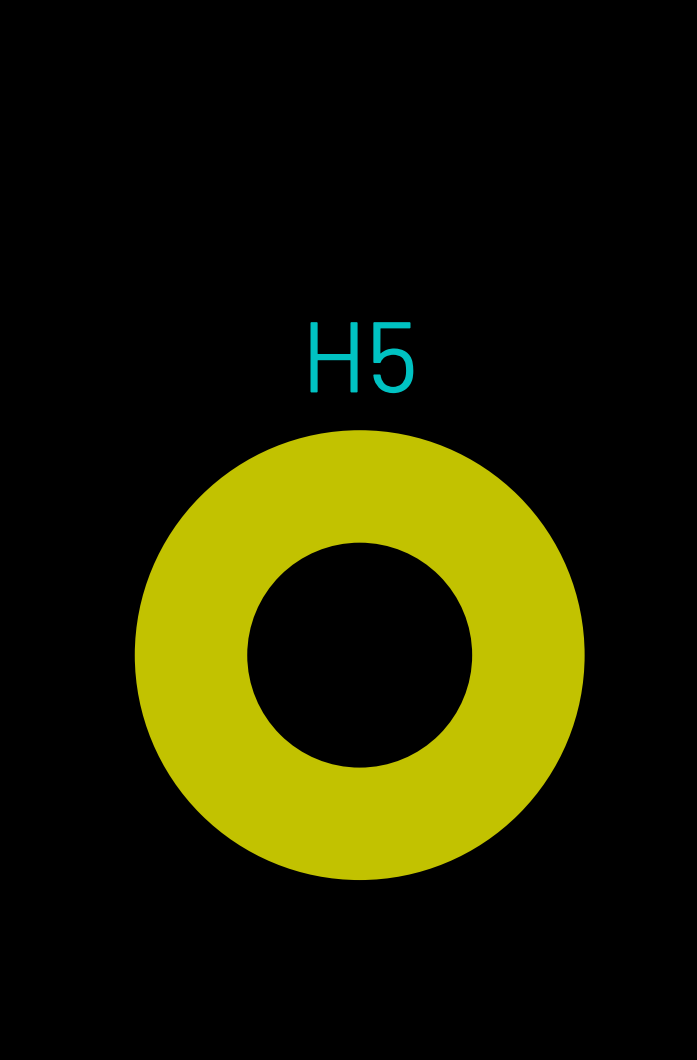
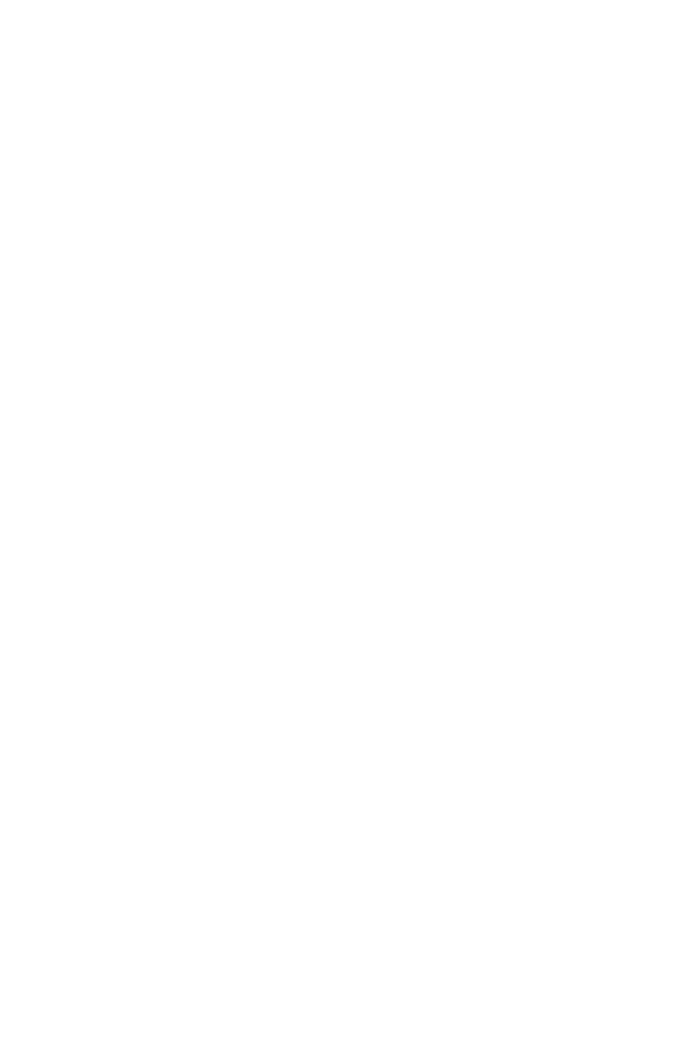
H5: (359, 655) -> none

